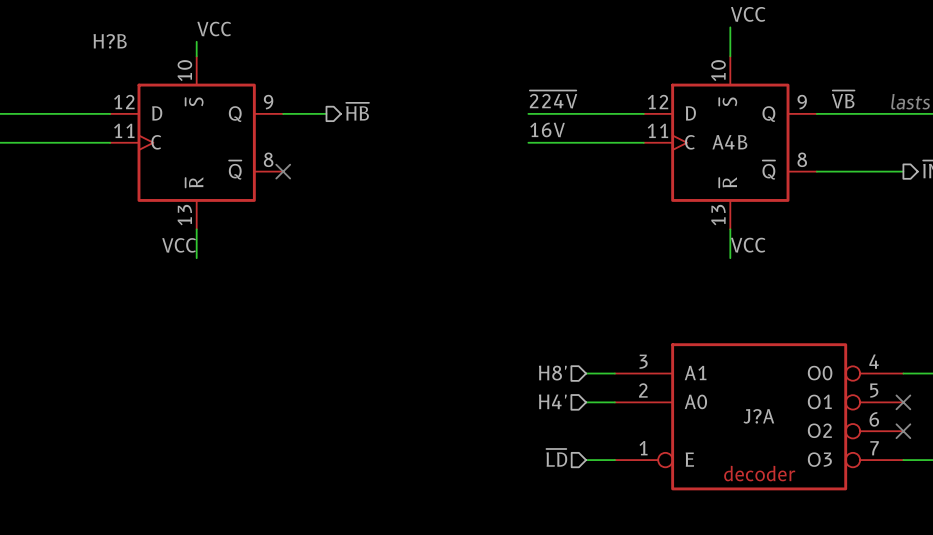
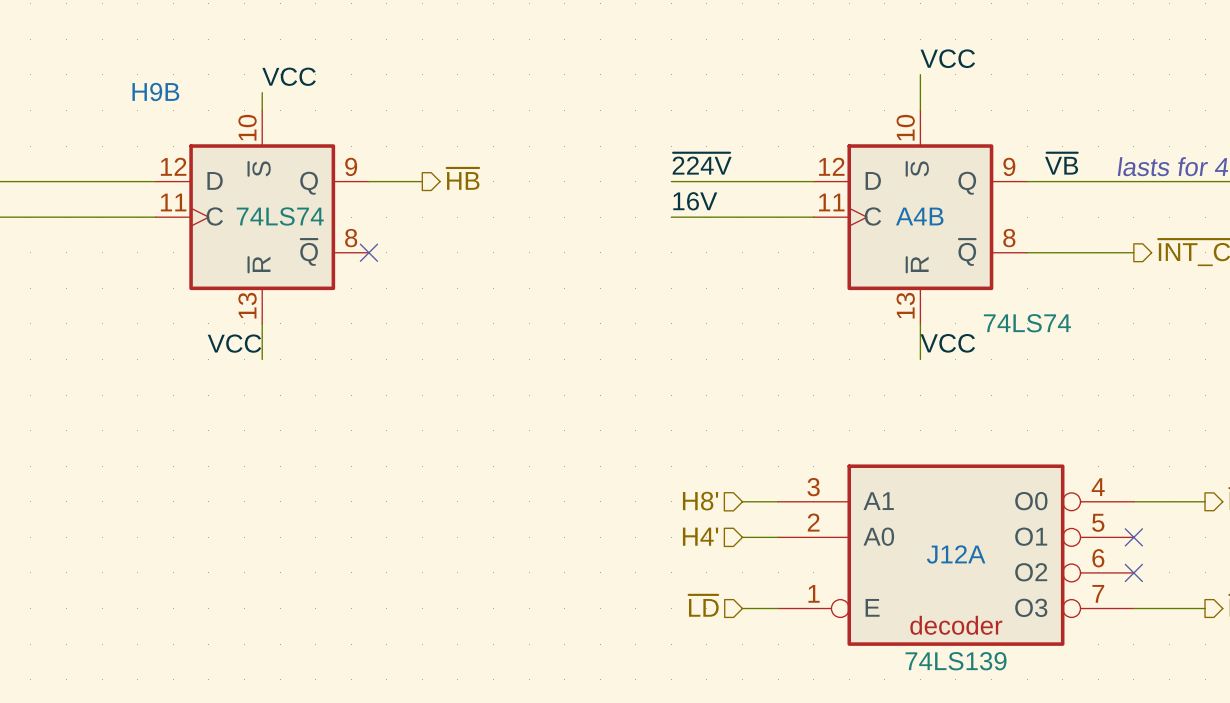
H?B name: H?B (110, 41) -> H9B (155, 91)
H?B value: none -> 74LS74 (280, 216)
A4B value: none -> 74LS74 (1027, 323)
J?A name: J?A (758, 416) -> J12A (956, 554)
J?A value: none -> 74LS139 (956, 661)

